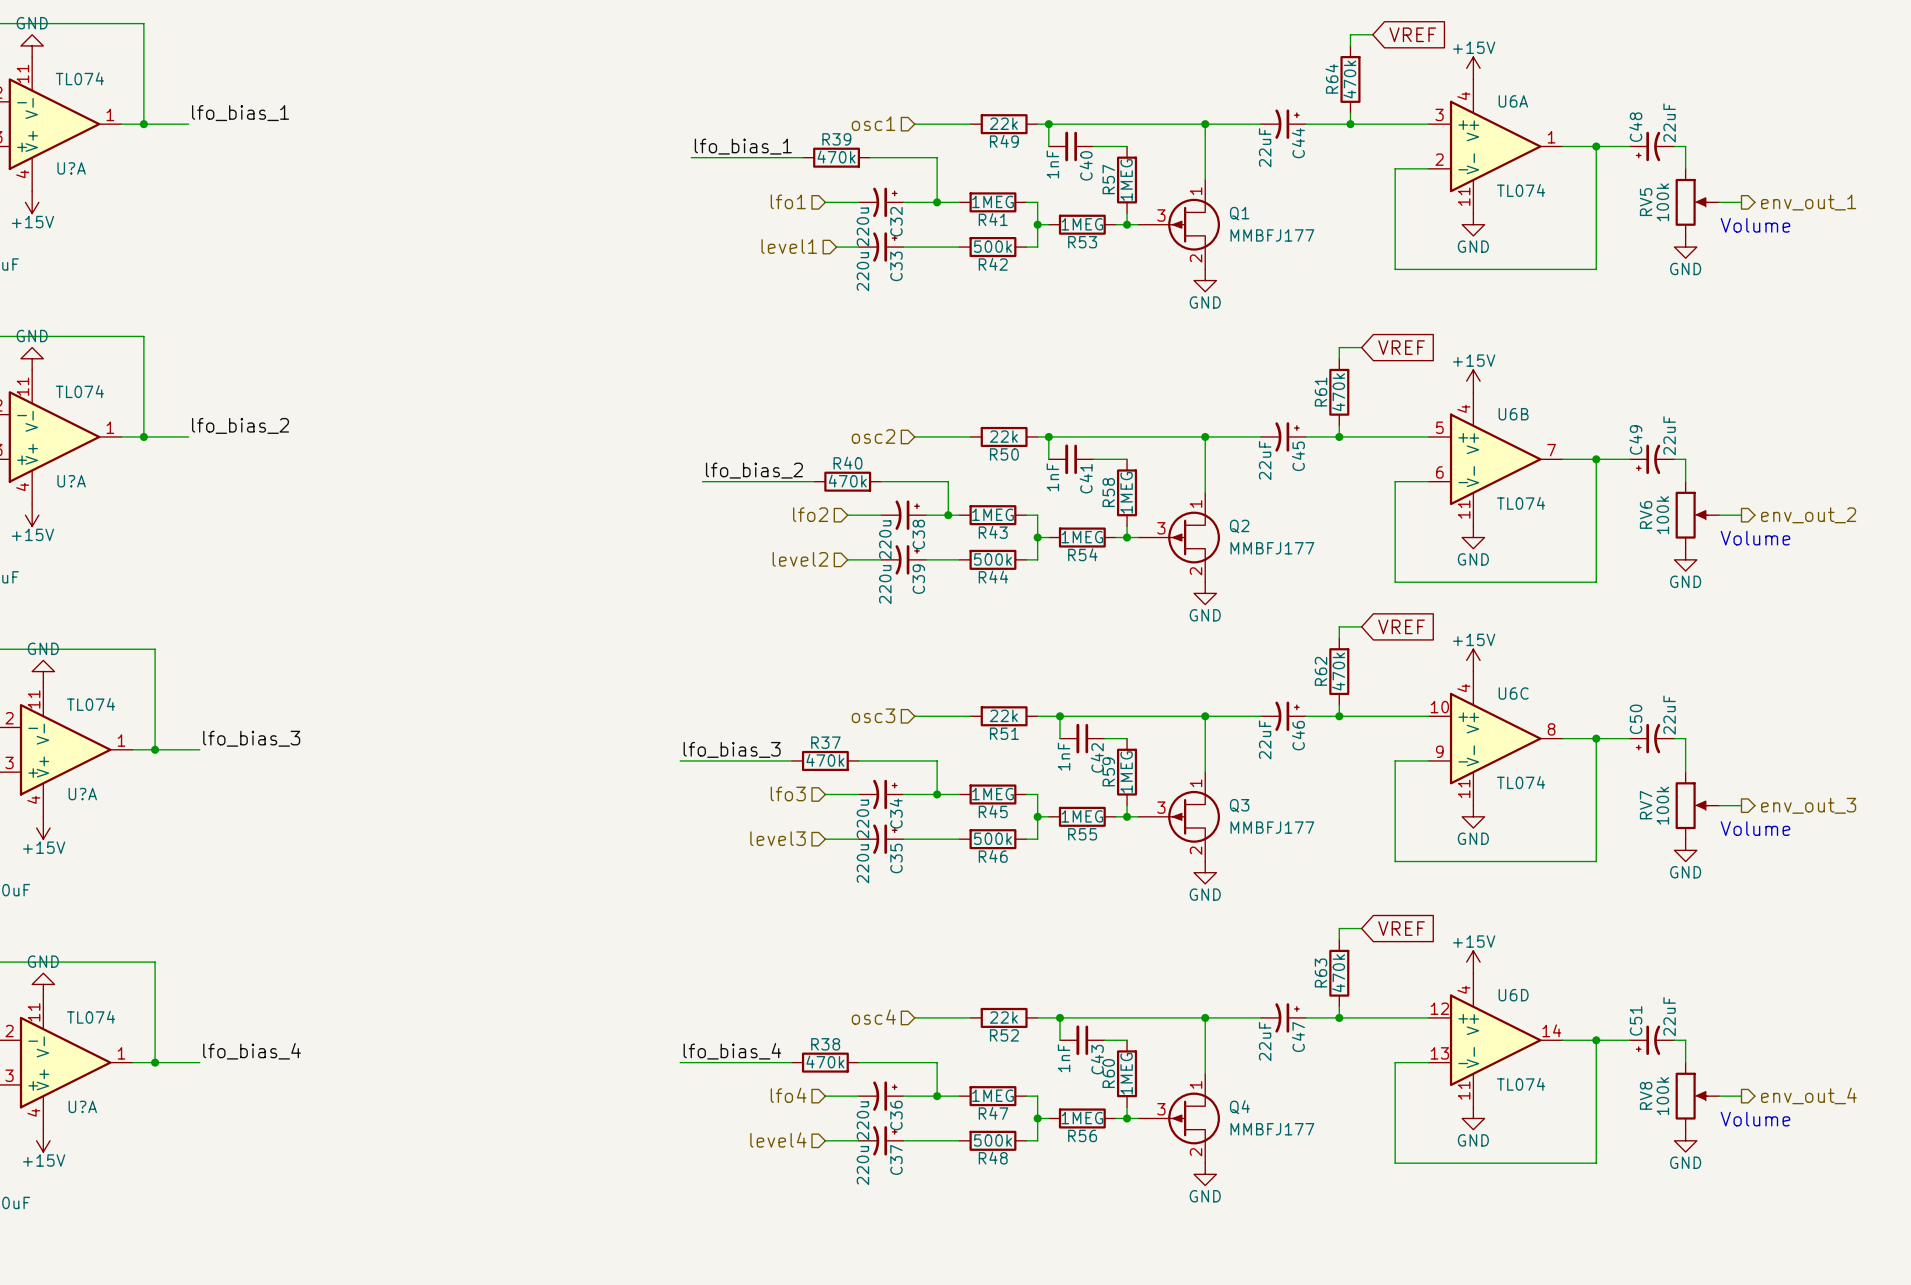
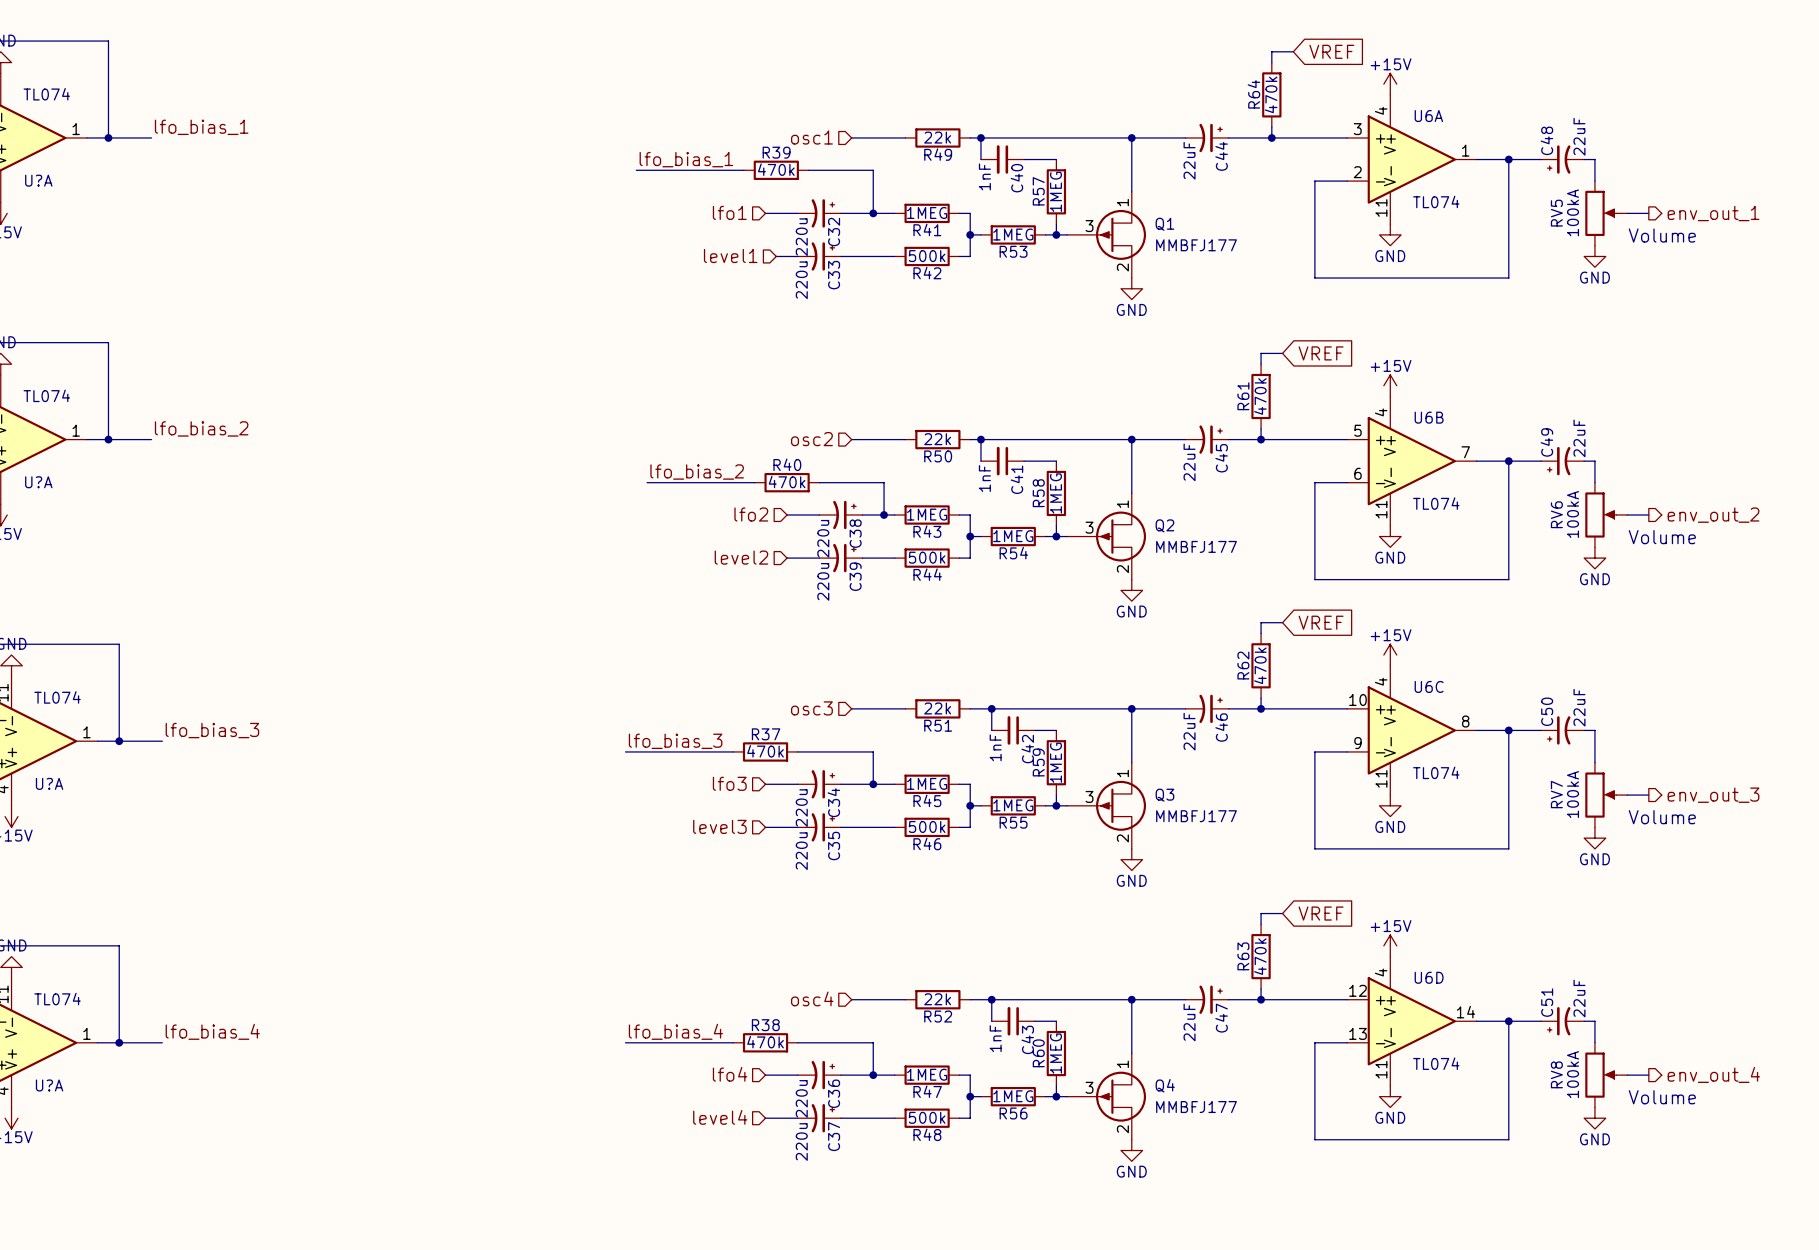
RV5 value: 100k (1662, 202) -> 100kA (1573, 212)
RV6 value: 100k (1662, 515) -> 100kA (1573, 514)
RV7 value: 100k (1662, 805) -> 100kA (1573, 794)
RV8 value: 100k (1662, 1096) -> 100kA (1573, 1074)

